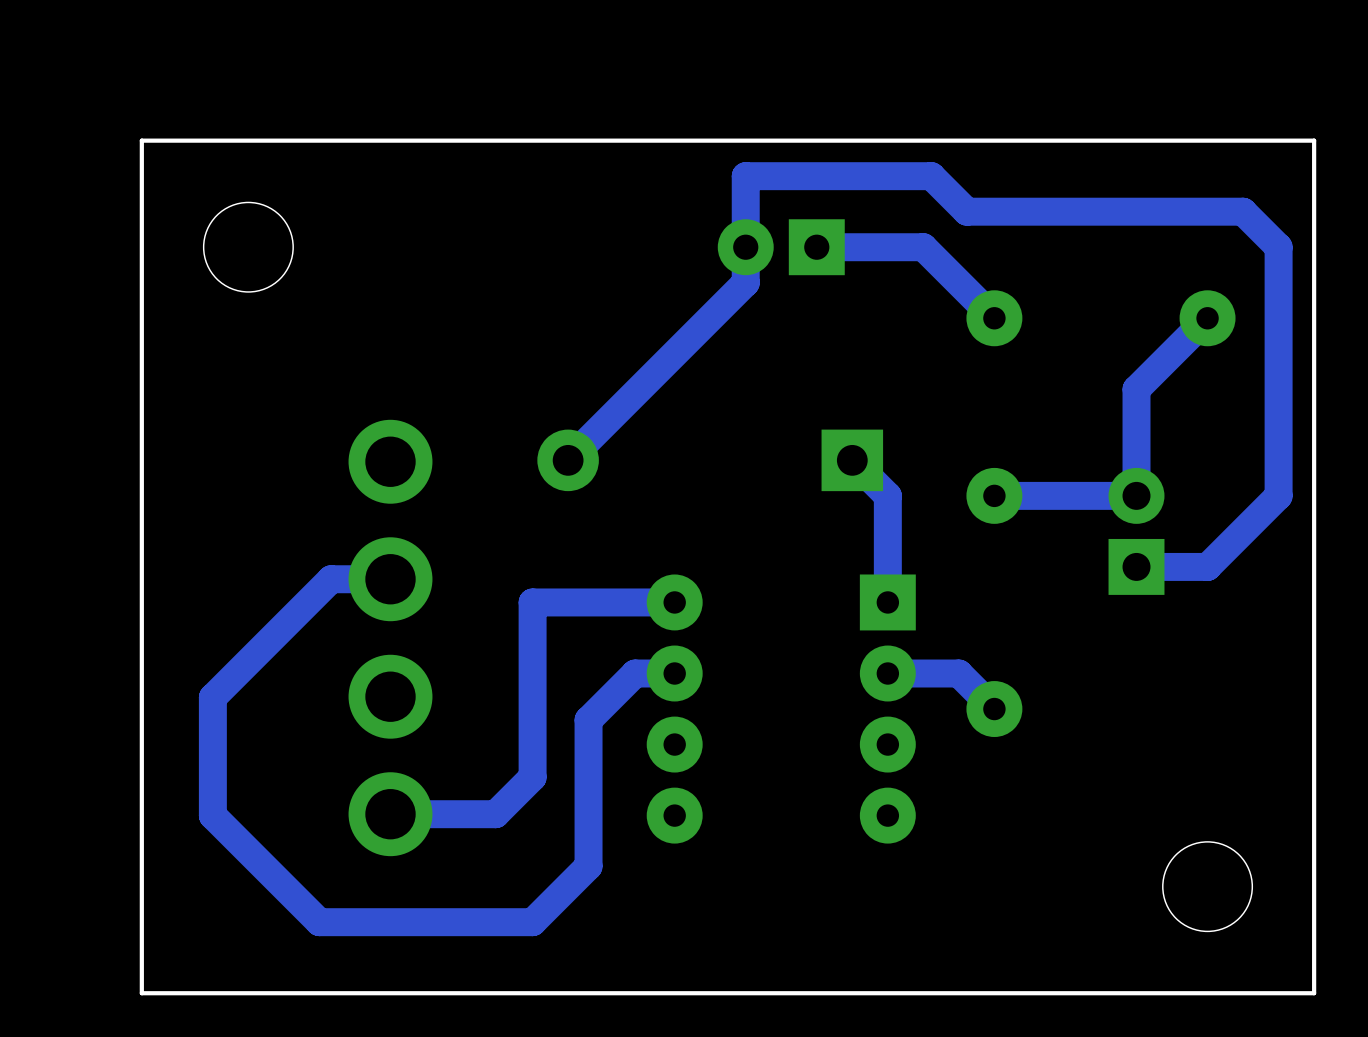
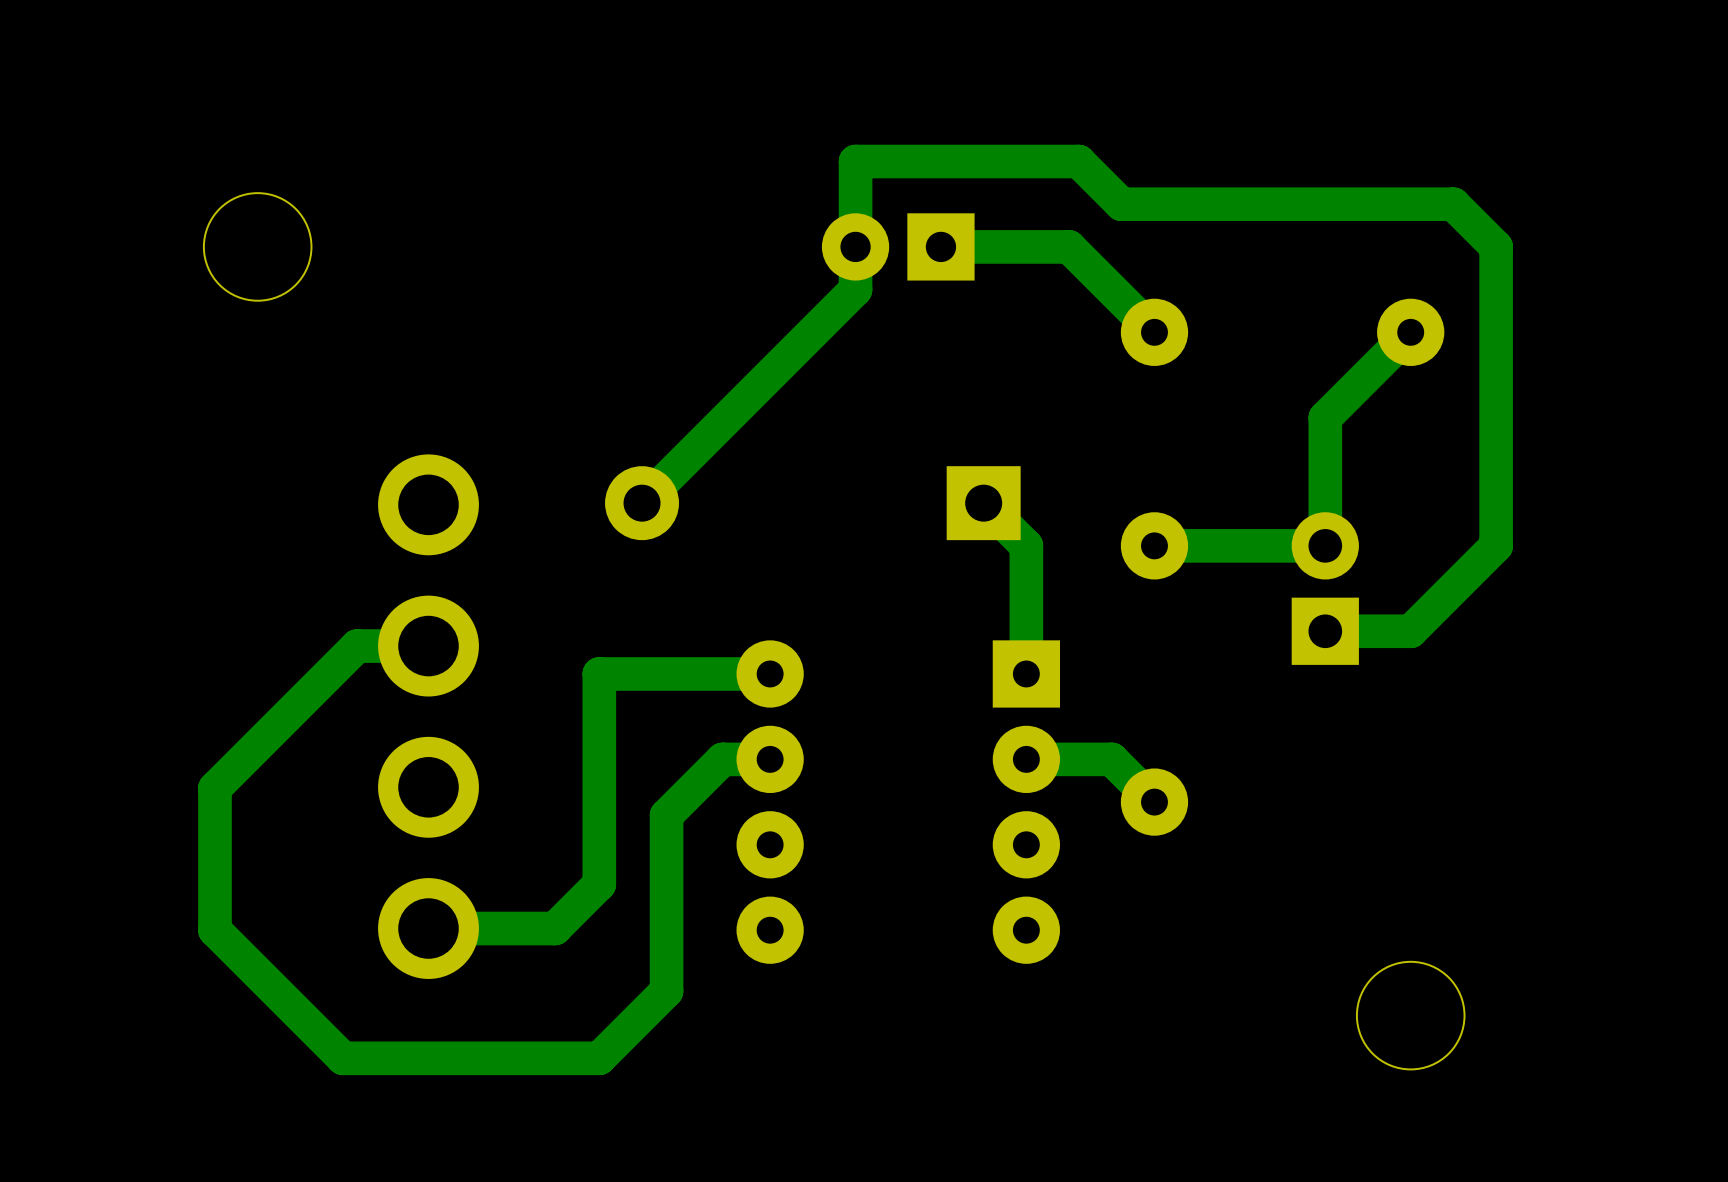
board edge: (1314, 140) (1314, 993) (141, 993) (141, 140) (1314, 140) -> none

